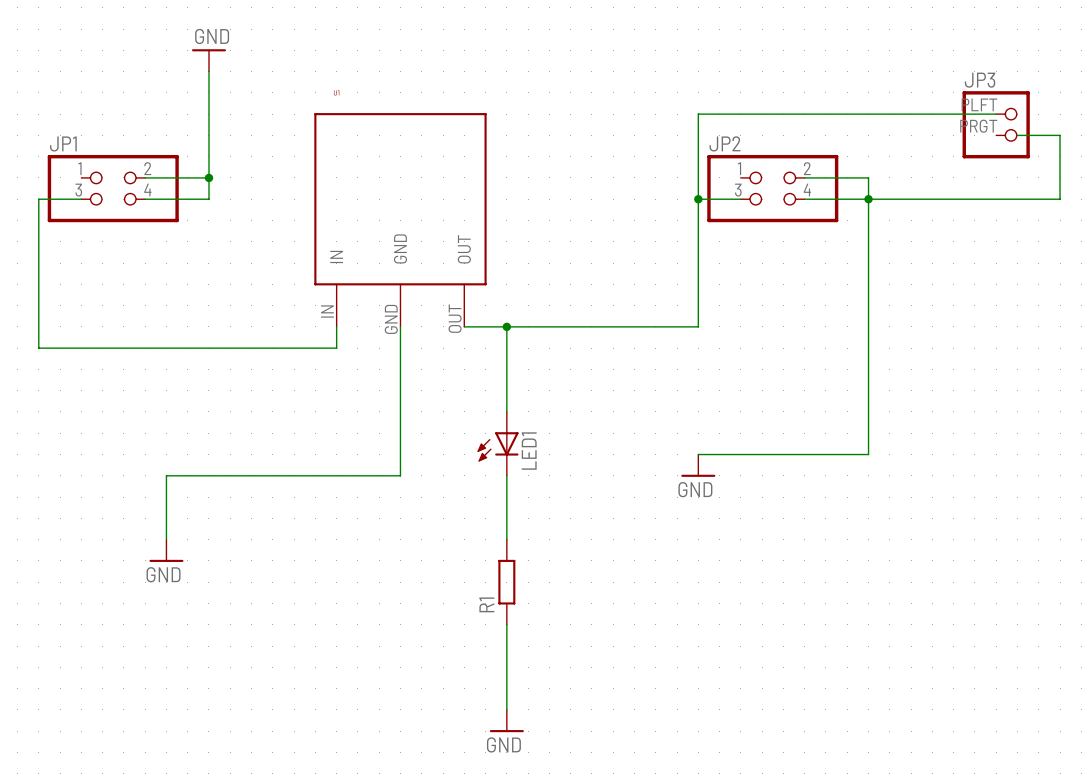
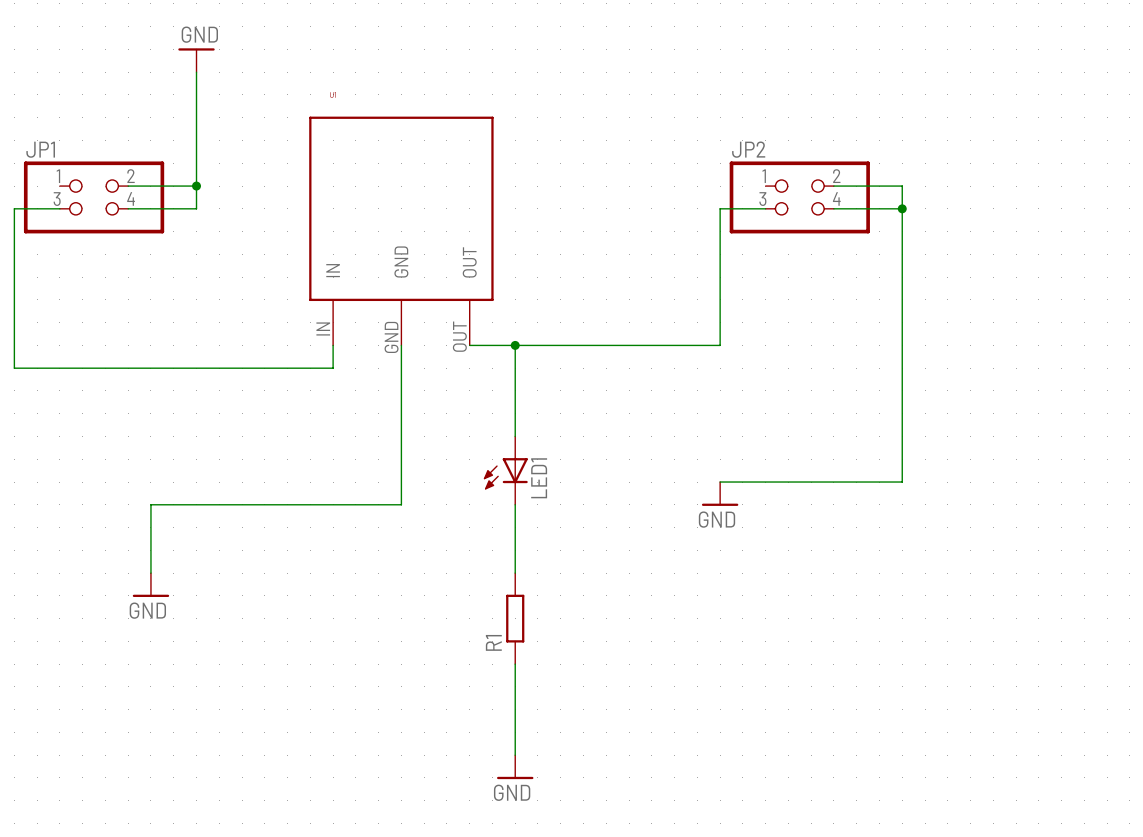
wire: (996, 114) (698, 114) (698, 199) -> none
JP3: (996, 124) -> none
wire: (1017, 135) (1060, 135) (1060, 199) (868, 199) -> none
junction: (698, 199) -> none

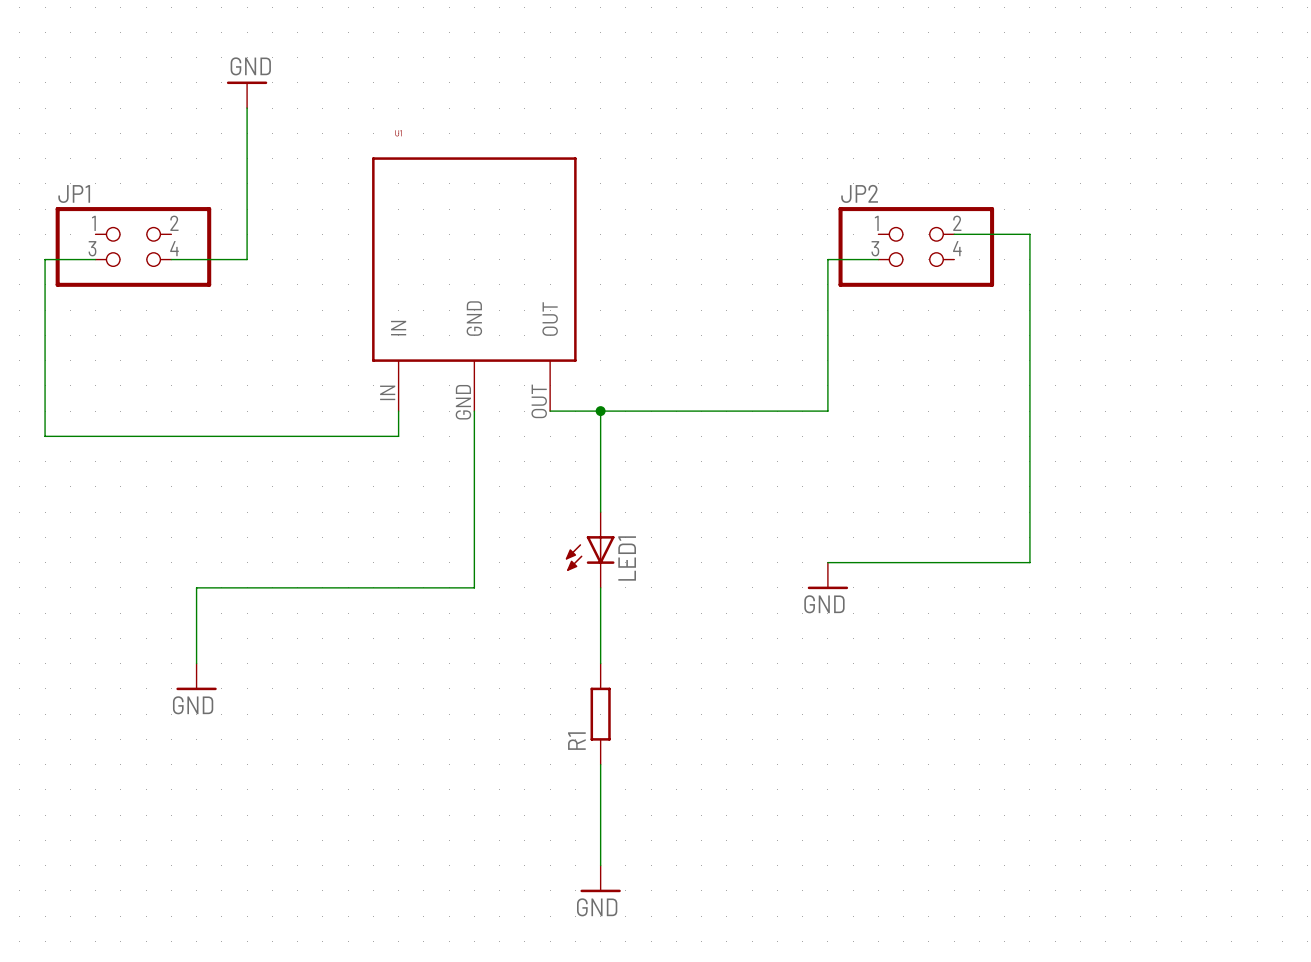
wire: (128, 186) (196, 186) -> none
junction: (196, 186) -> none
wire: (833, 208) (902, 208) -> none
junction: (902, 208) -> none

